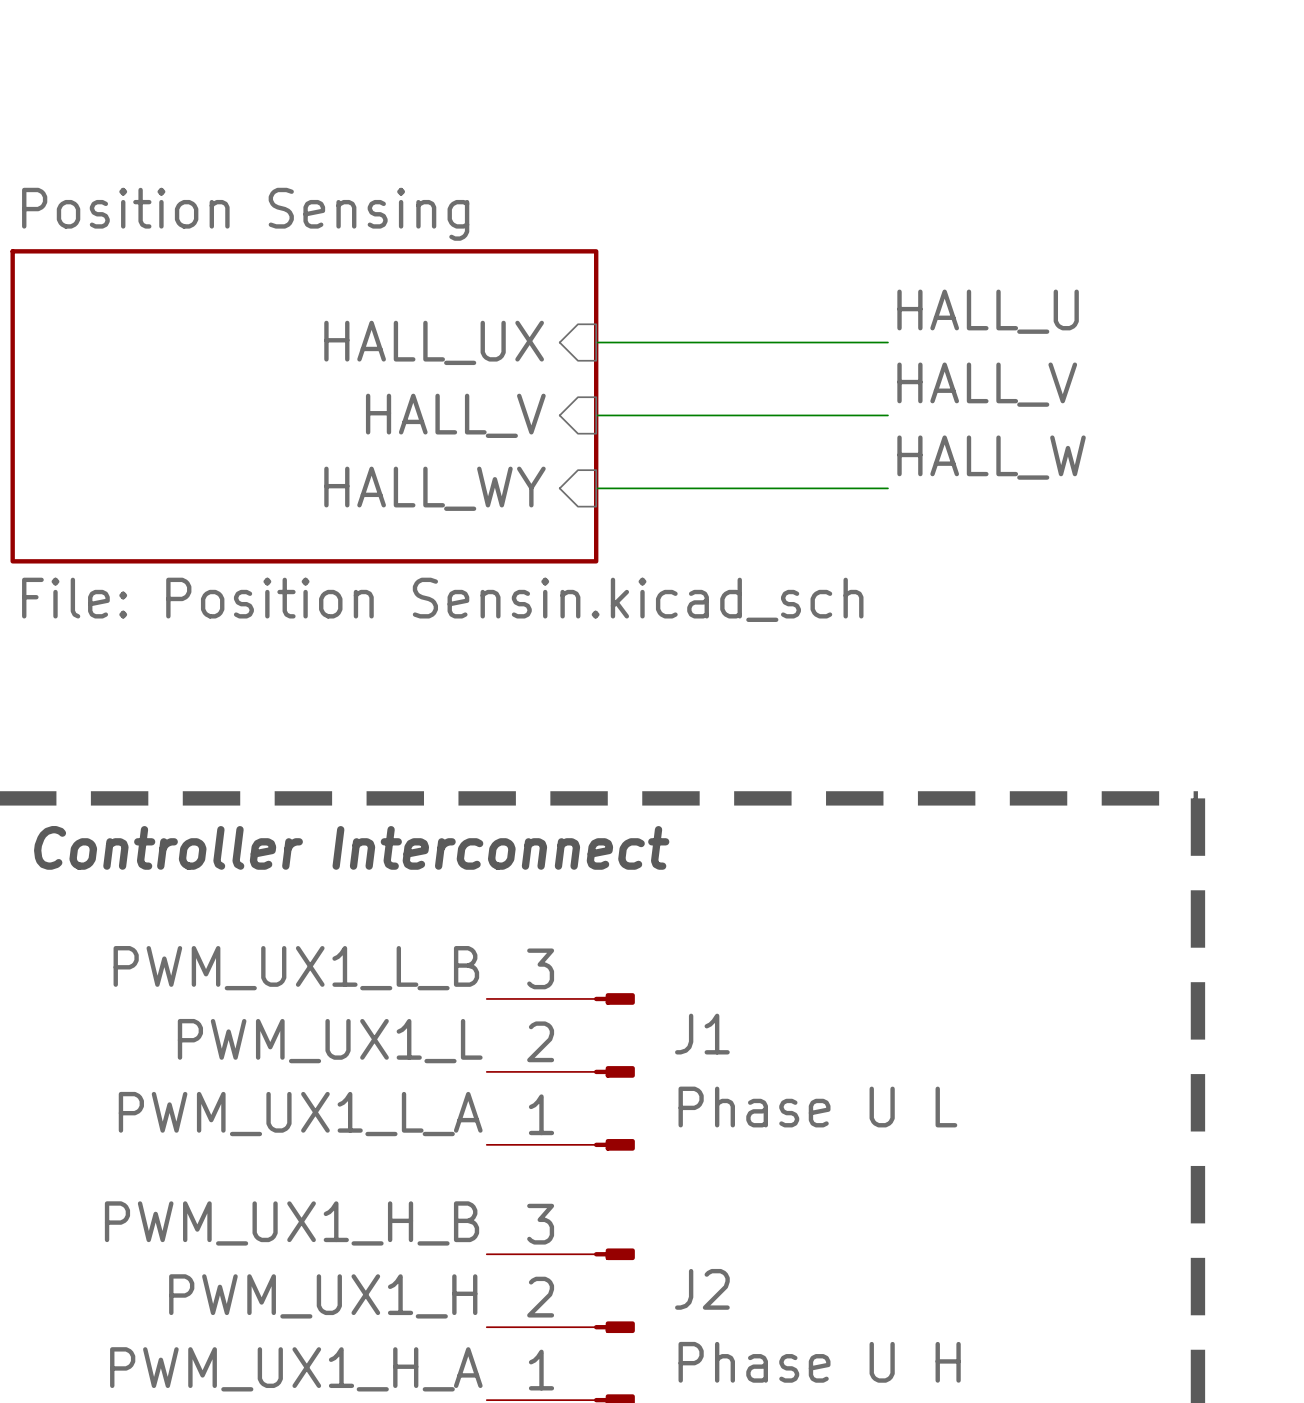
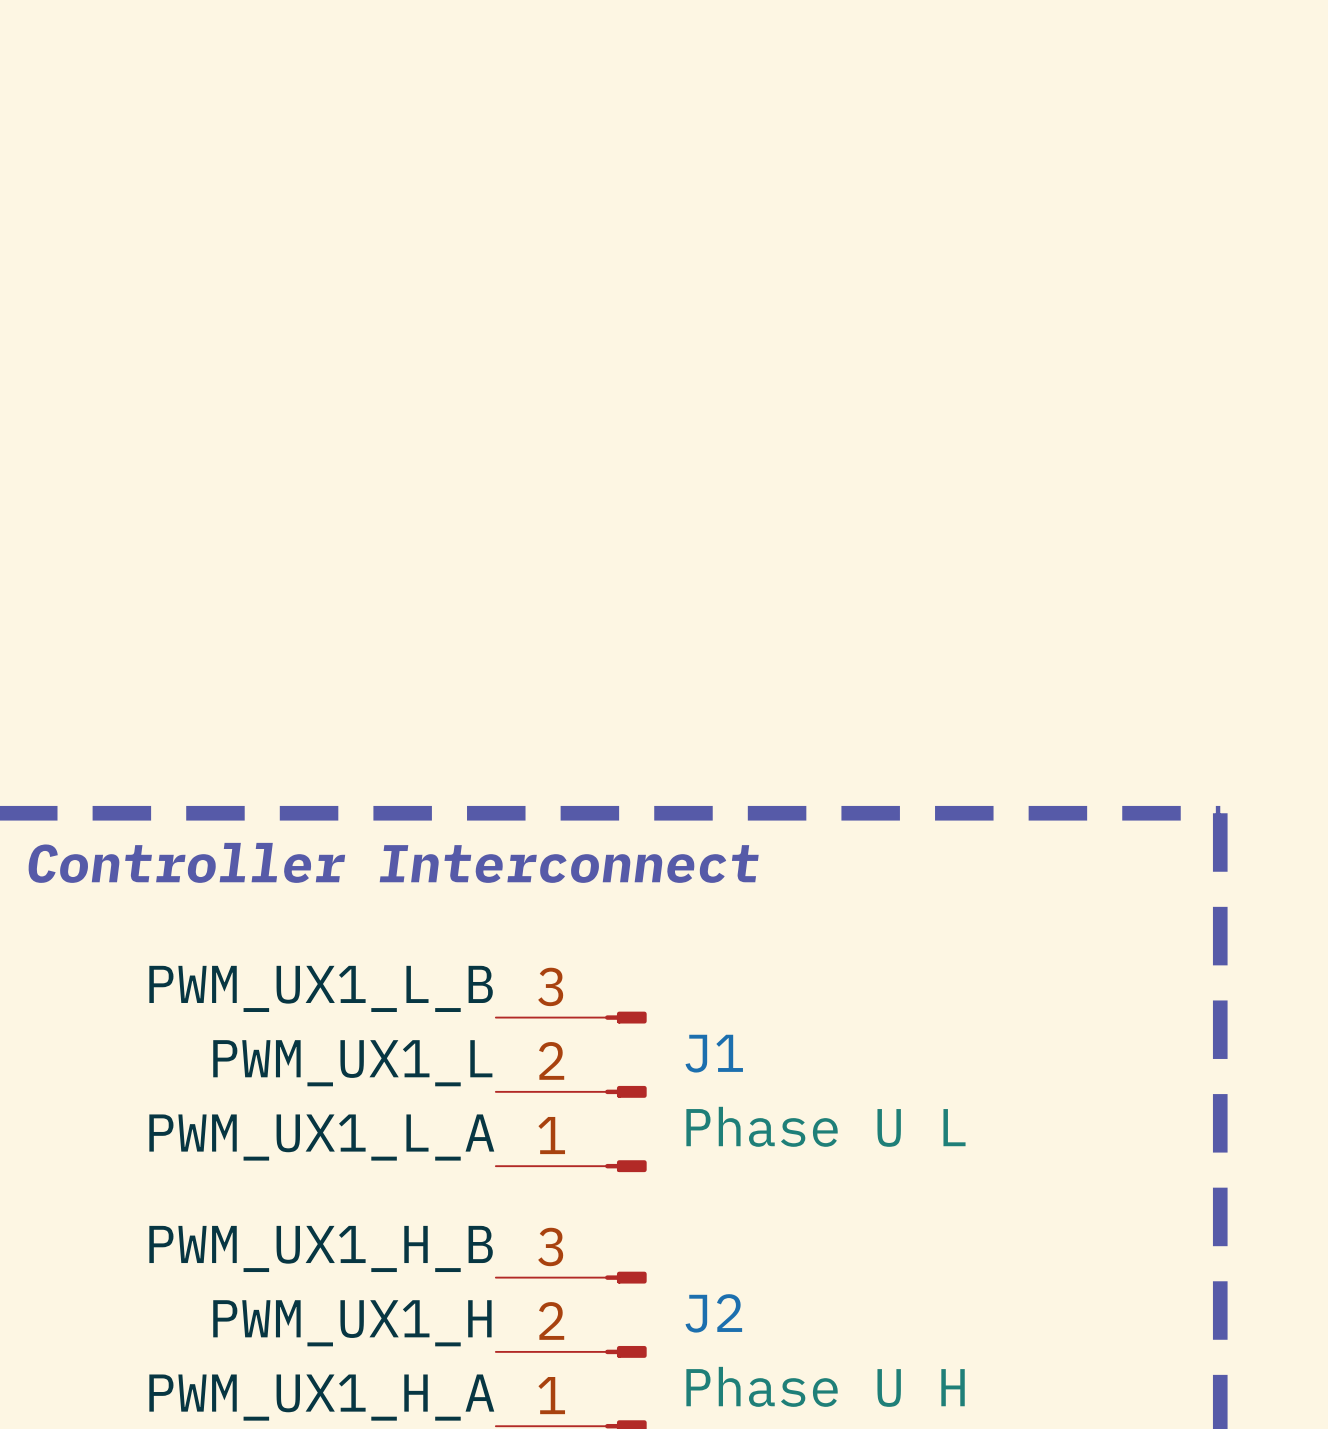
label: HALL_U (988, 311) -> none
sheet pin: HALL_UX (434, 342) -> none
wire: (596, 342) (887, 342) -> none
label: HALL_V (987, 384) -> none
sheet Position Sensing: File: Position Sensin.kicad_sch (304, 406) -> none
sheet pin: HALL_V (455, 415) -> none
wire: (596, 415) (887, 415) -> none
label: HALL_W (991, 457) -> none
sheet pin: HALL_WY (434, 488) -> none
wire: (596, 488) (887, 488) -> none

